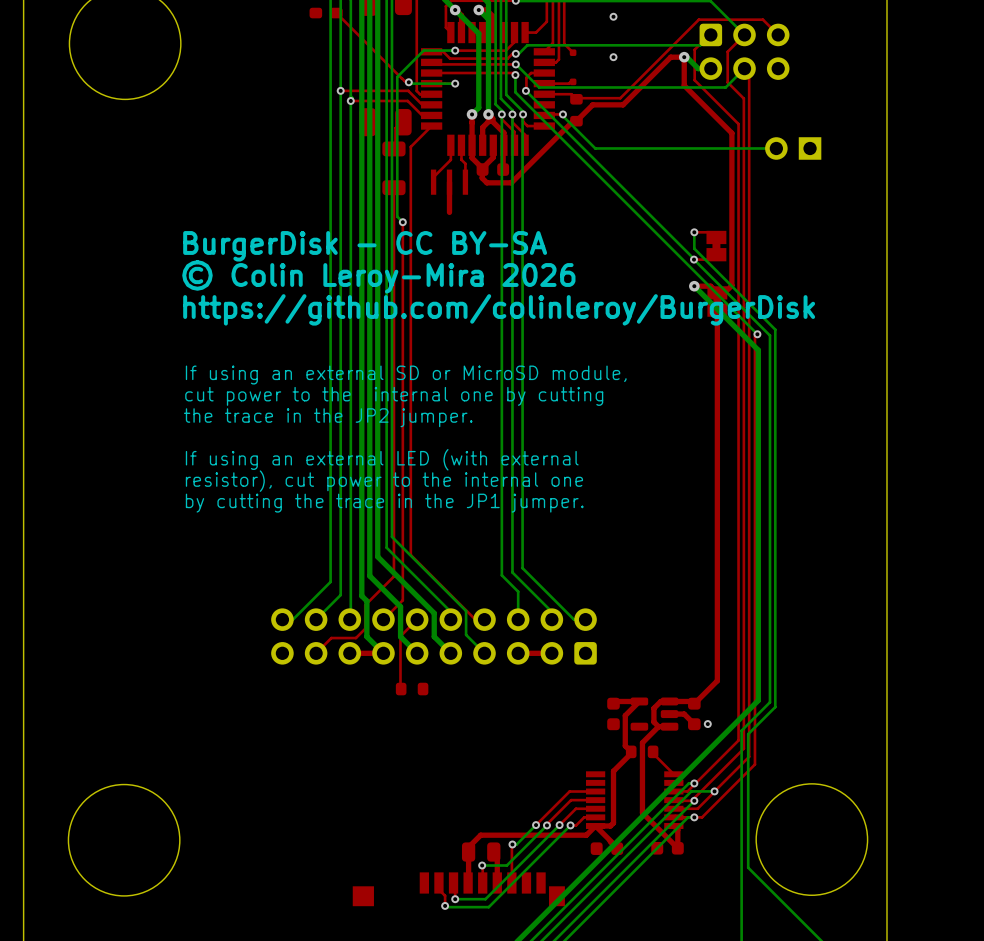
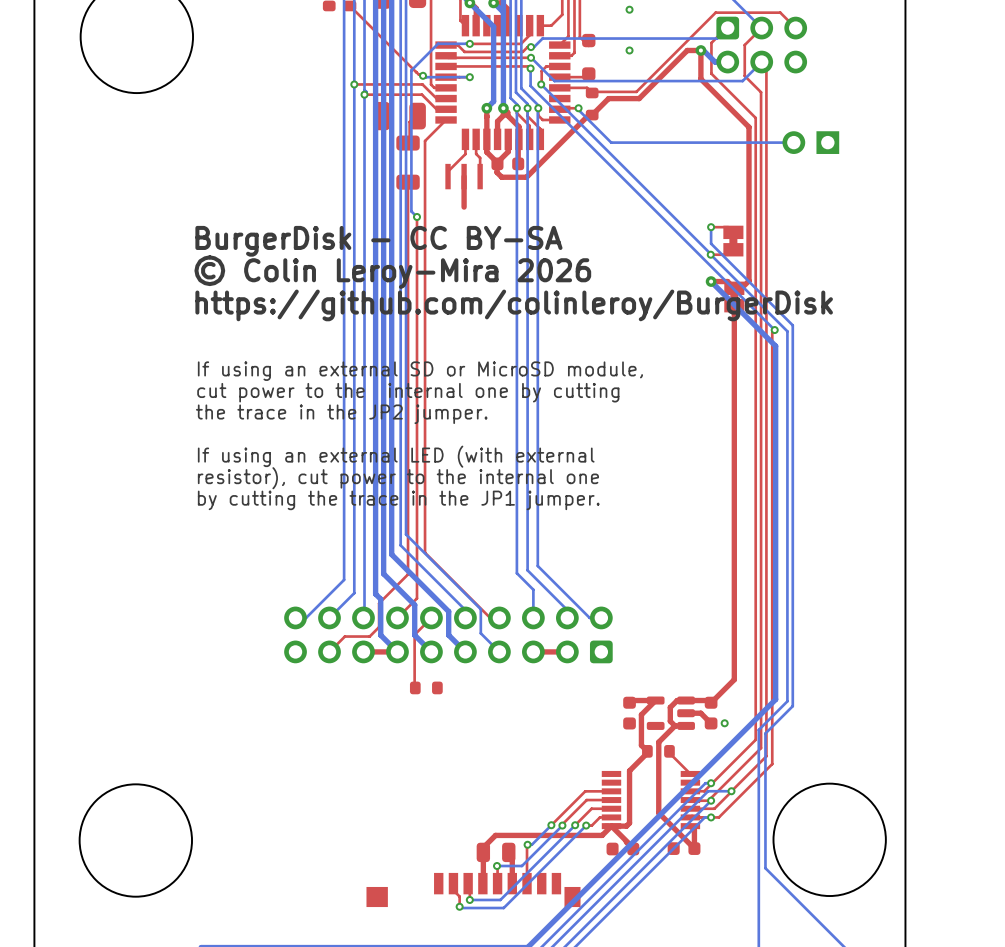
part footprint: [569, 49, 577, 86] -> [582, 33, 596, 81]

